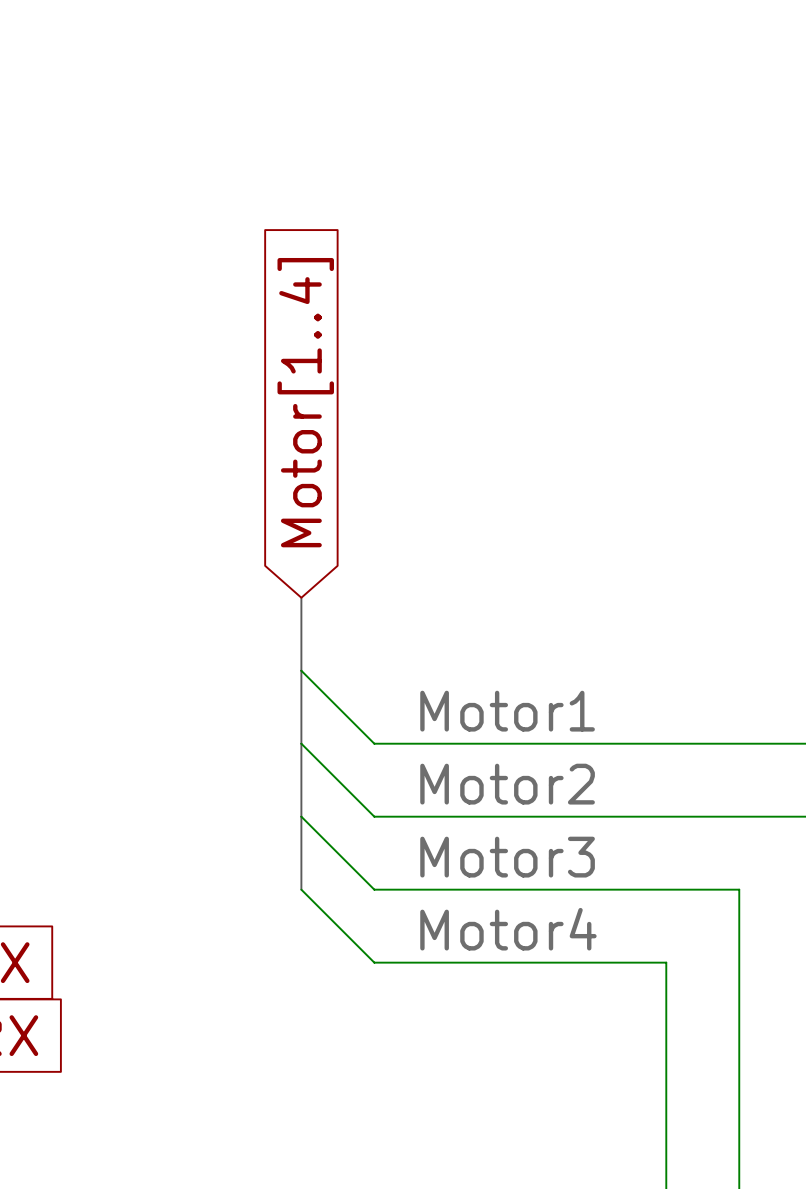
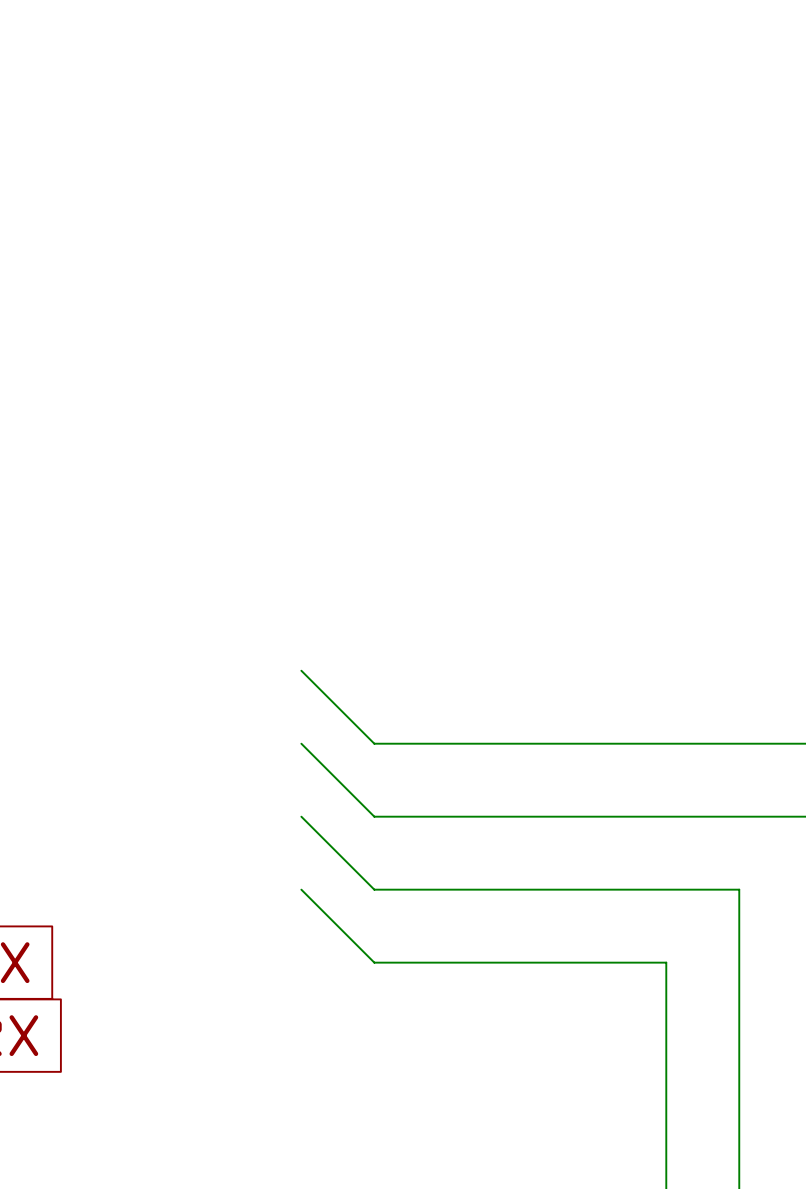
global label: Motor[1..4] (305, 402) -> none
bus: (301, 597) (301, 889) -> none
label: Motor1 (507, 711) -> none
label: Motor2 (507, 784) -> none
label: Motor3 (507, 857) -> none
label: Motor4 (508, 929) -> none

